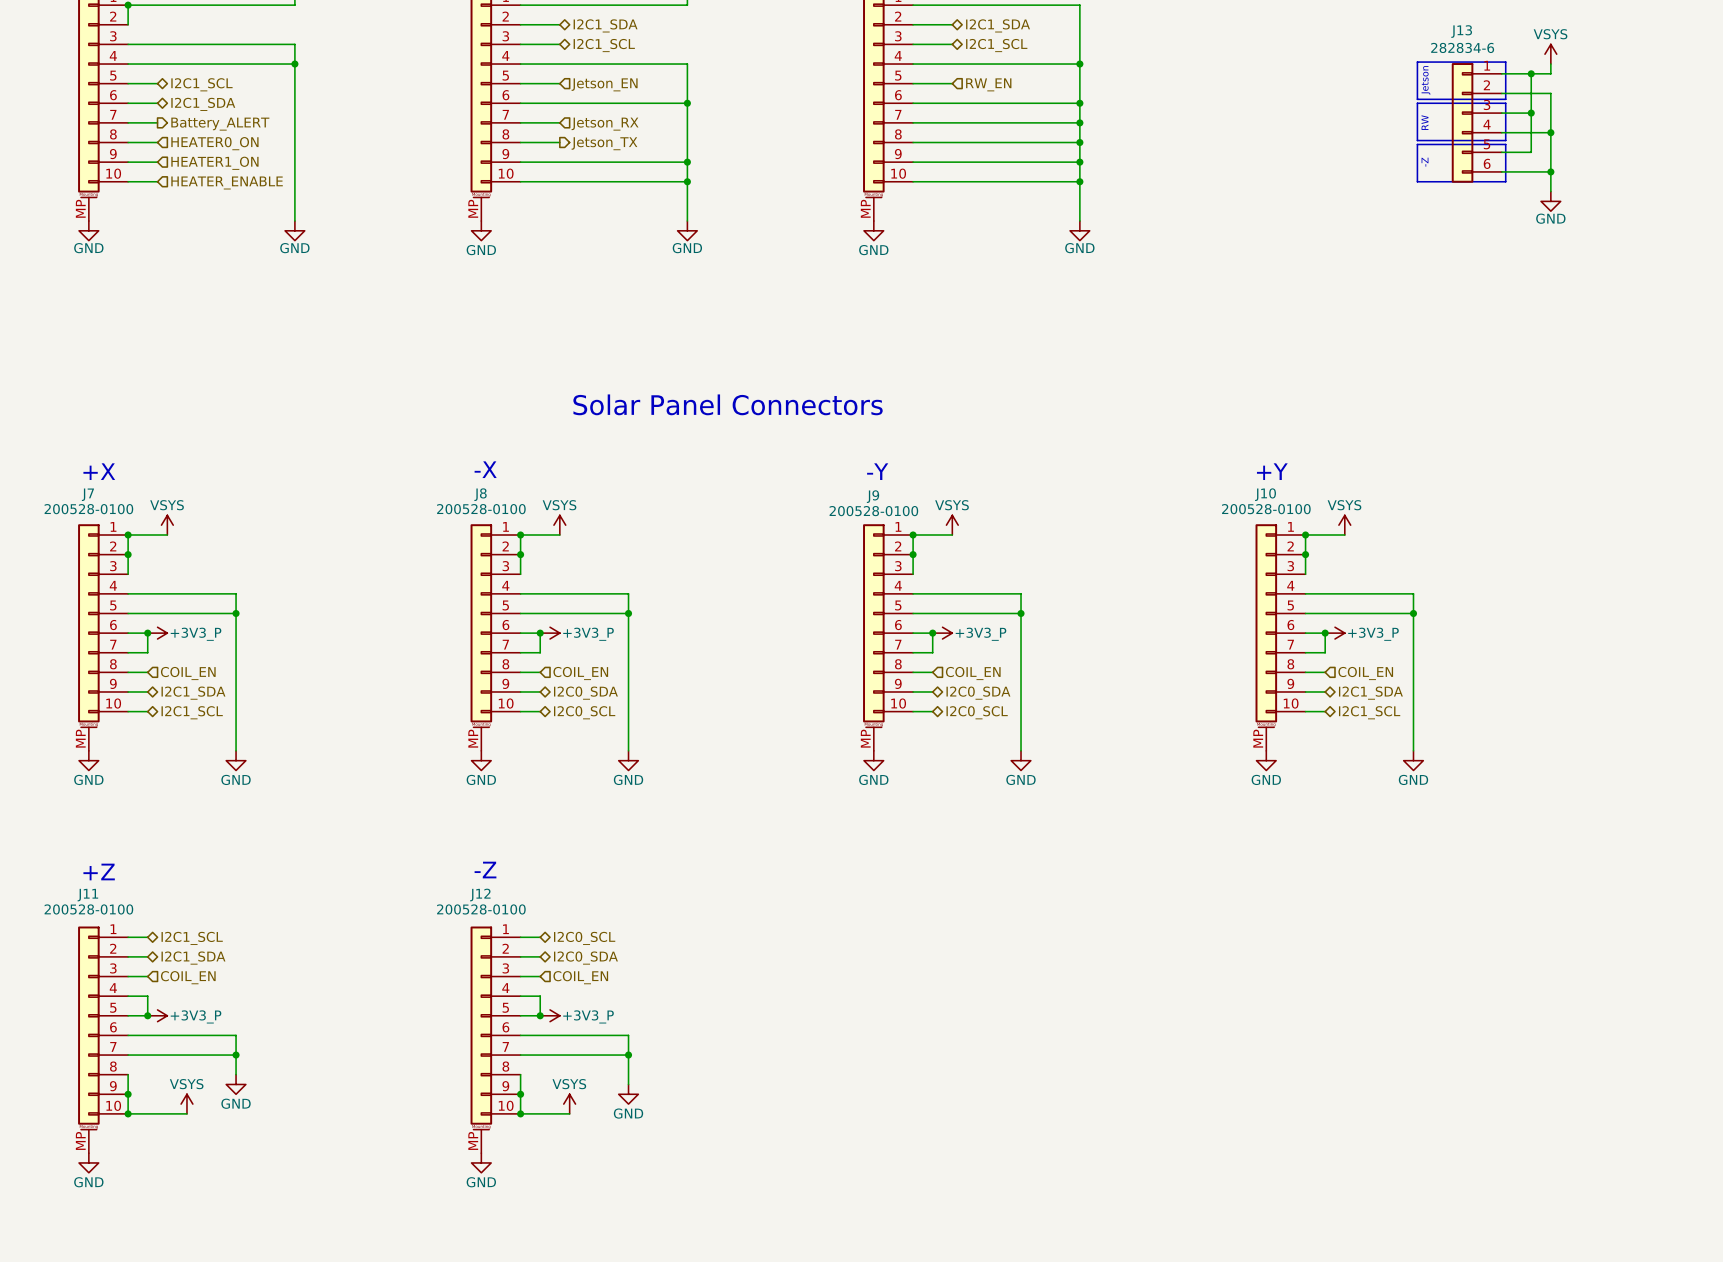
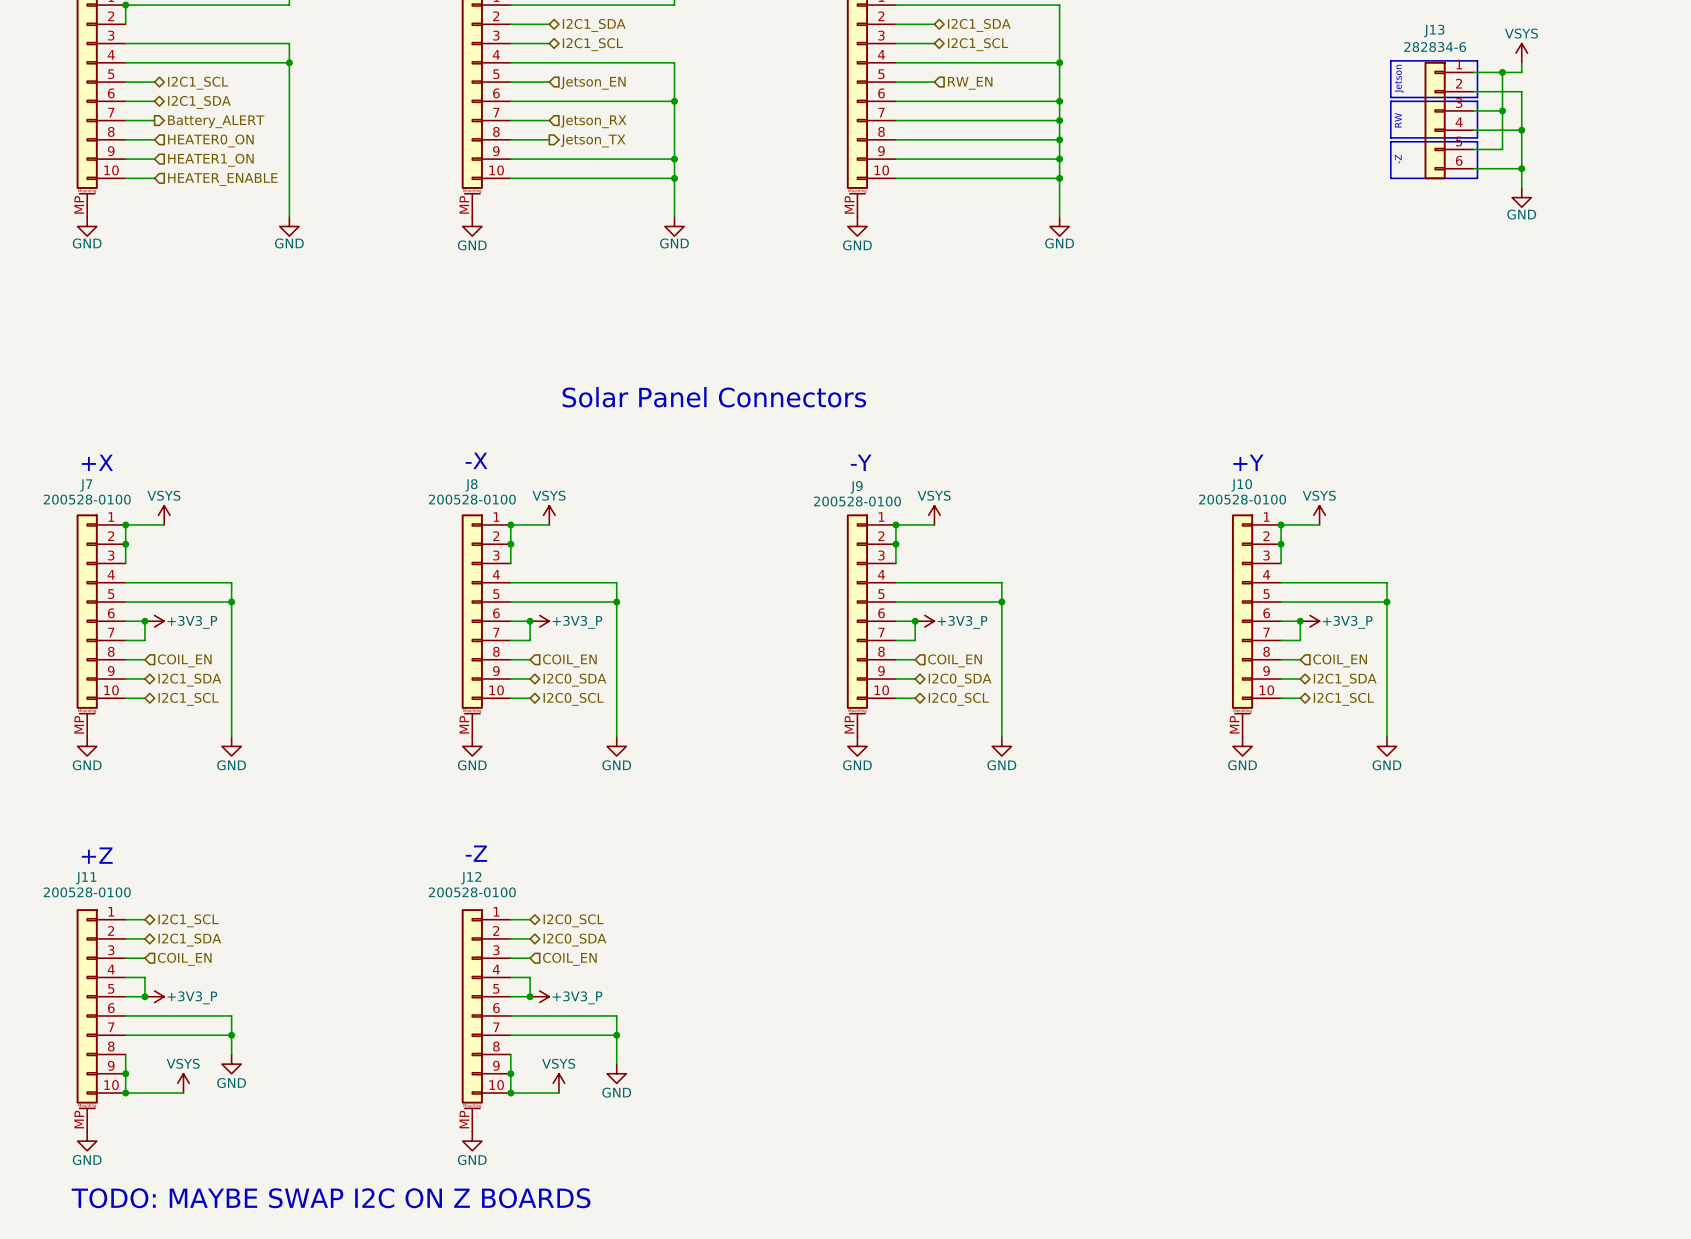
text: none -> TODO: MAYBE SWAP I2C ON Z BOARDS (331, 1198)

